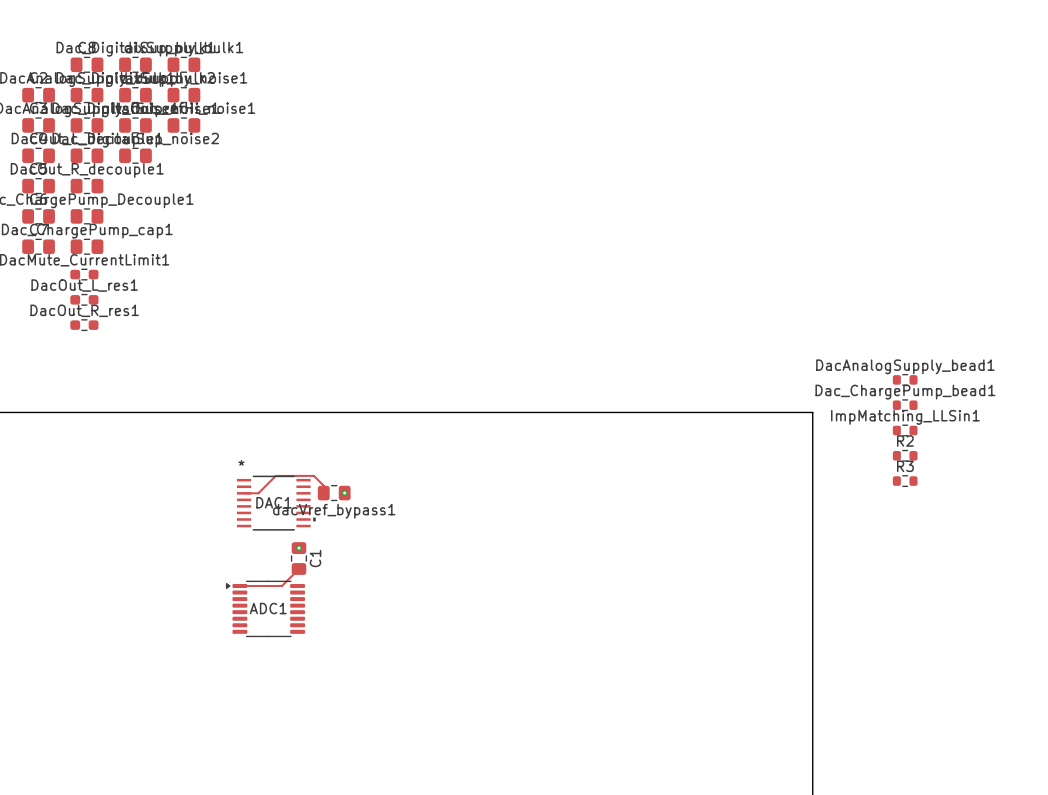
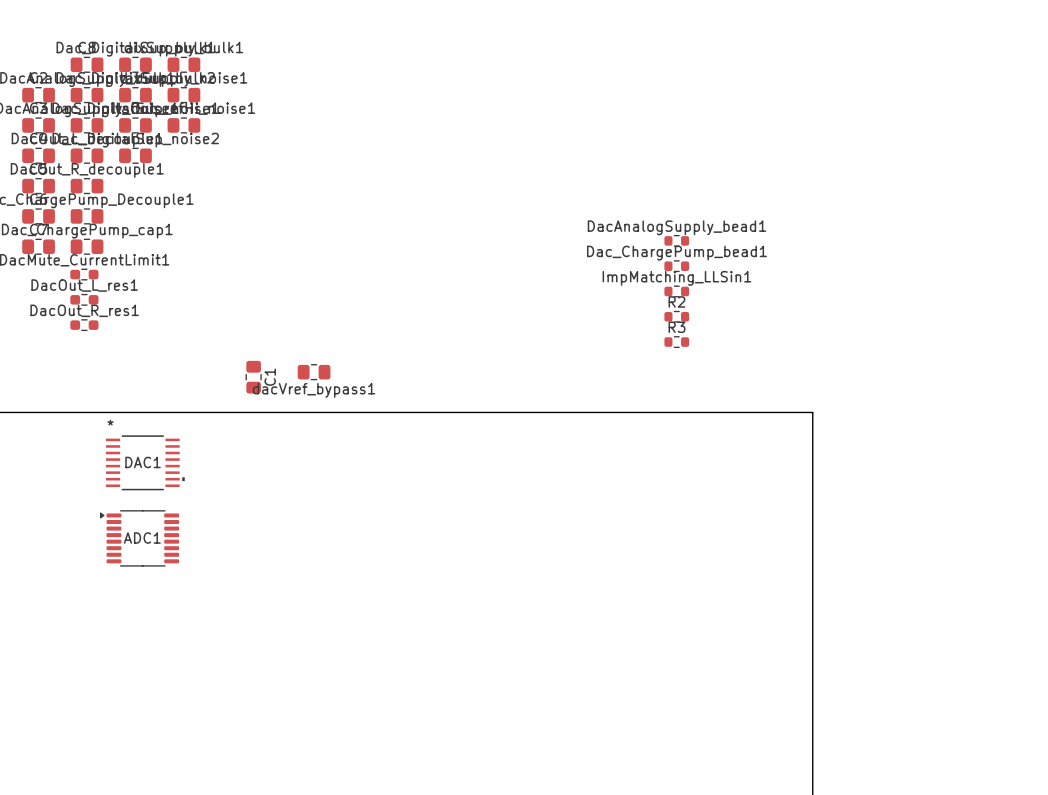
DacAnalogSupply_bead1 position: (905, 379) -> (676, 240)
Dac_ChargePump_bead1 position: (905, 405) -> (676, 266)
ImpMatching_LLSin1 position: (905, 430) -> (676, 291)
R2 position: (905, 455) -> (676, 316)
R3 position: (905, 481) -> (676, 342)
track: (323, 493) (323, 485) (313, 475) (275, 475) (258, 493) (244, 493) -> none
dacVref_bypass1 position: (334, 493) -> (314, 372)
via: (344, 493) -> none
DAC1 position: (276, 503) -> (145, 462)
via: (298, 548) -> none
C1 position: (298, 558) -> (253, 377)
track: (298, 568) (281, 585) (239, 585) -> none
ADC1 position: (265, 608) -> (139, 538)

